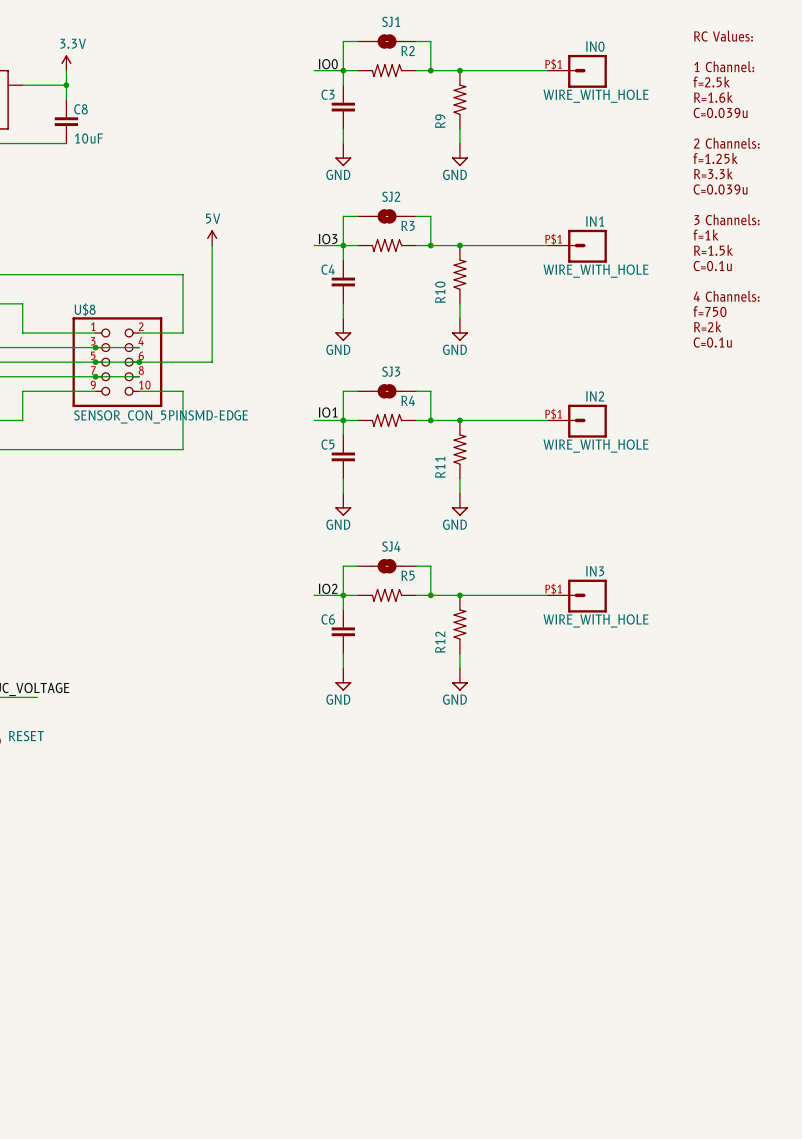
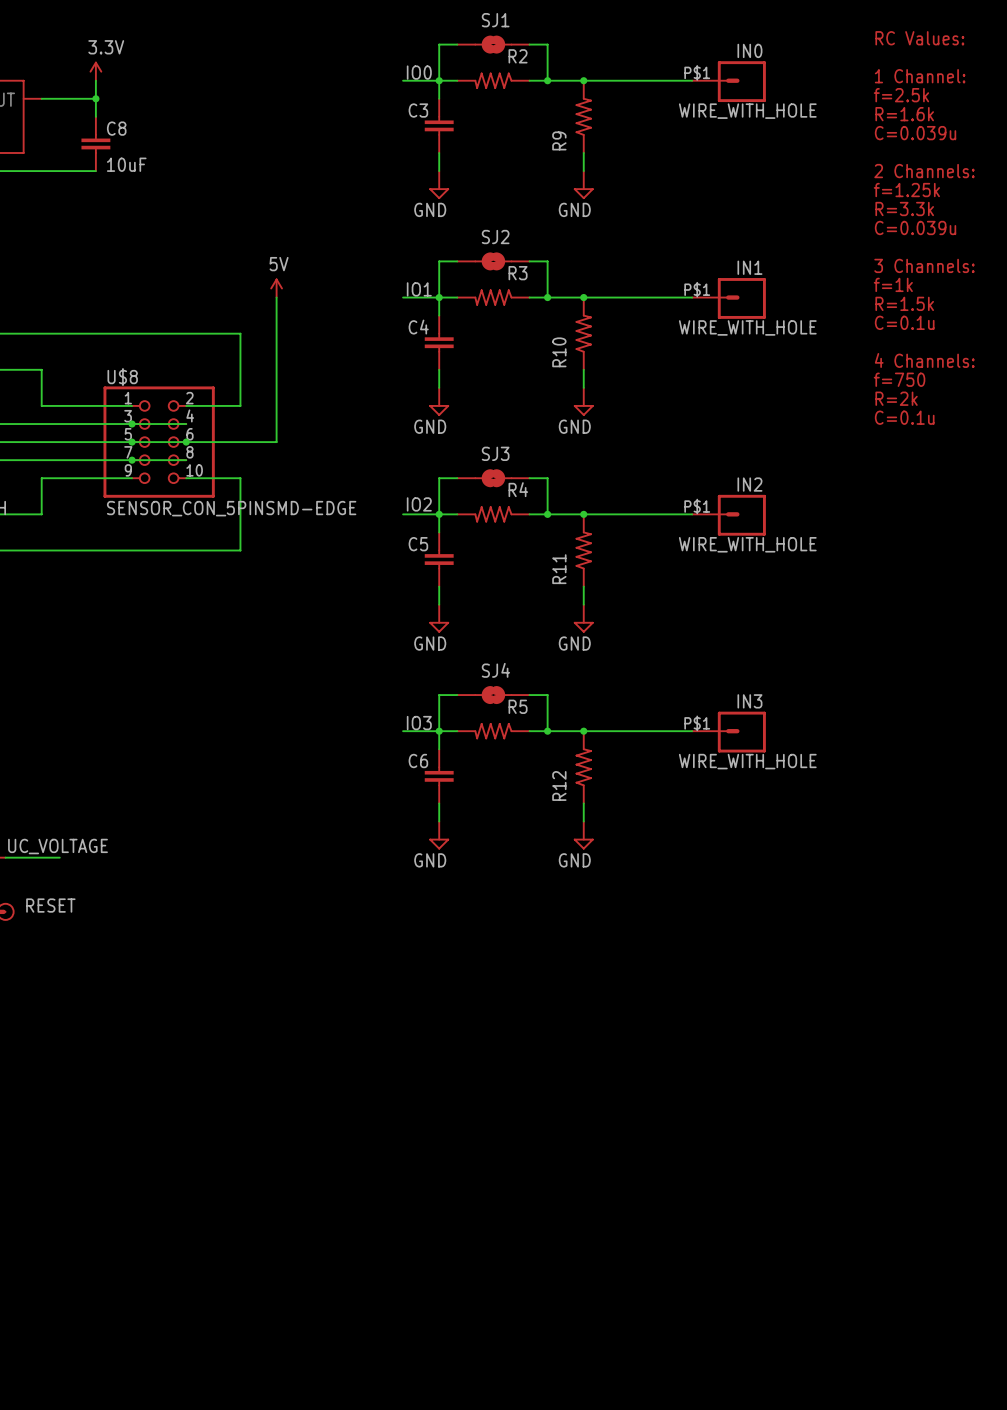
label: IO3 (328, 239) -> IO1 (419, 289)
label: IO1 (328, 412) -> IO2 (419, 504)
label: IO2 (328, 588) -> IO3 (419, 723)

